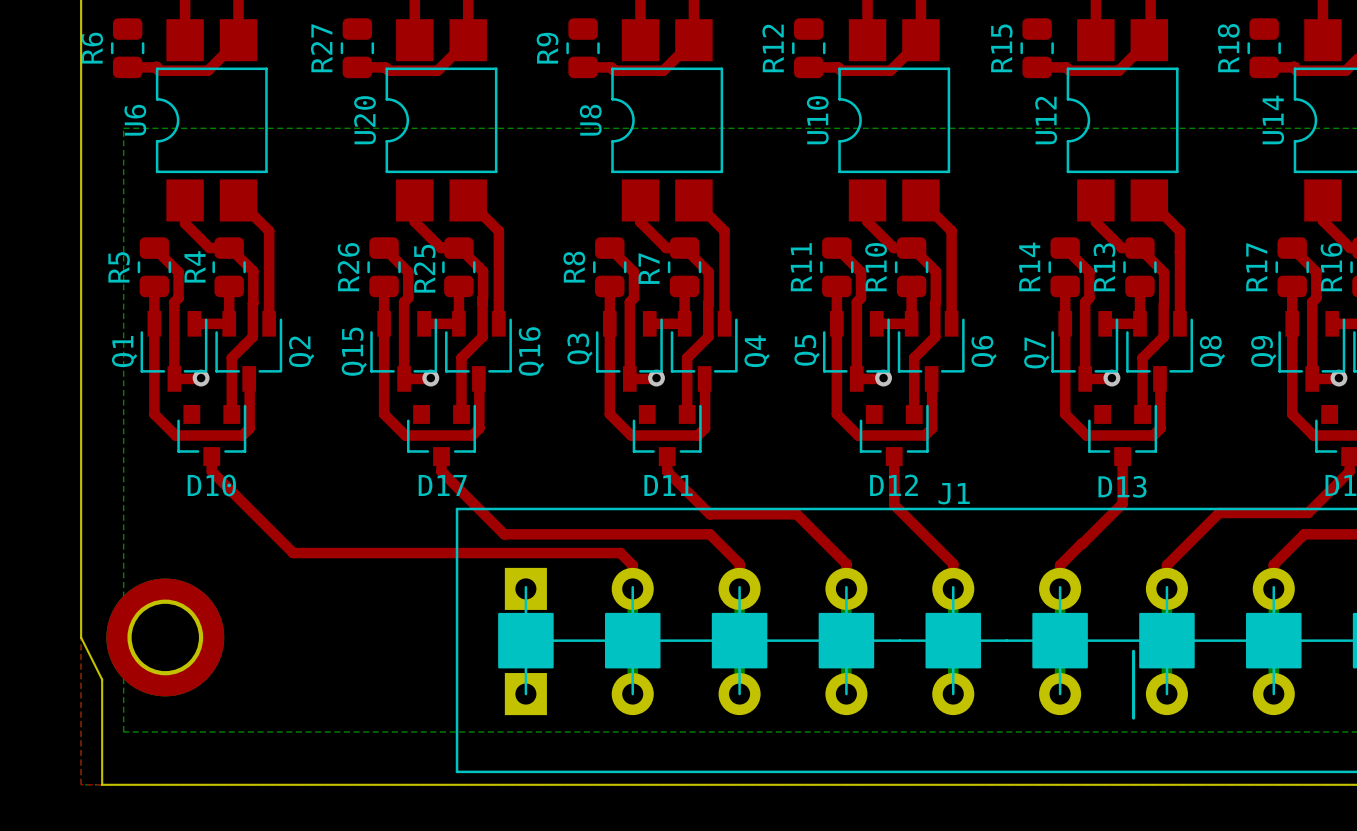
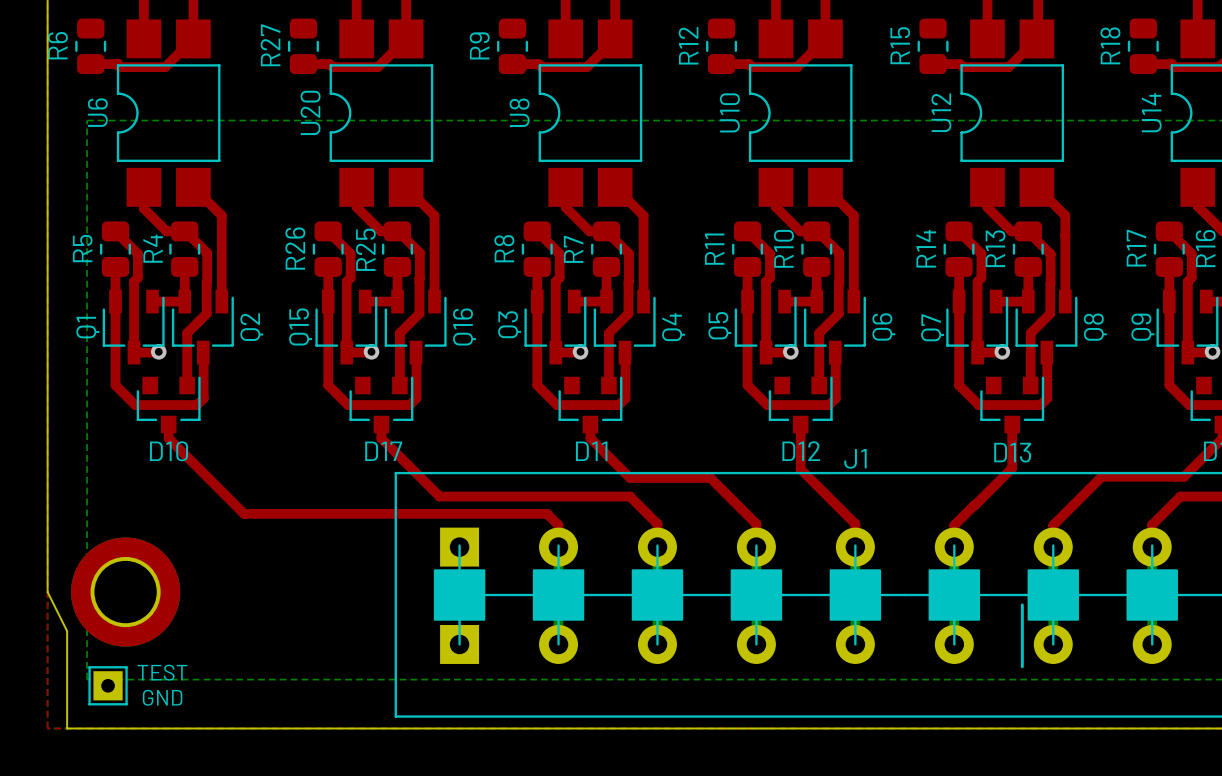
text: none -> TEST (162, 672)
part: none -> (108, 685)
text: none -> GND (162, 697)

